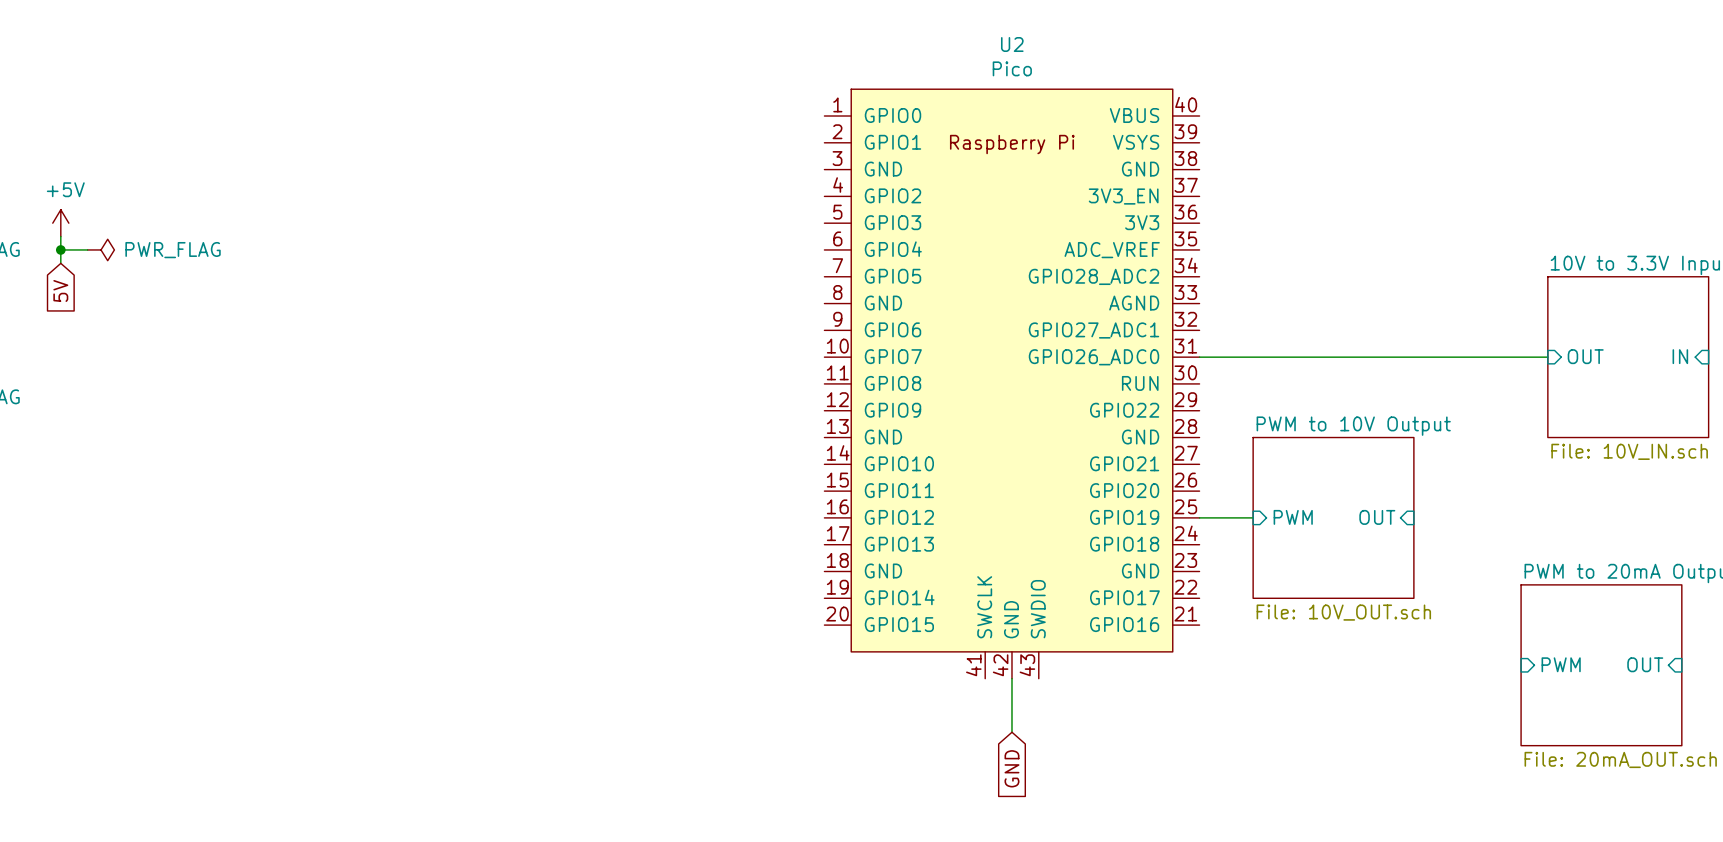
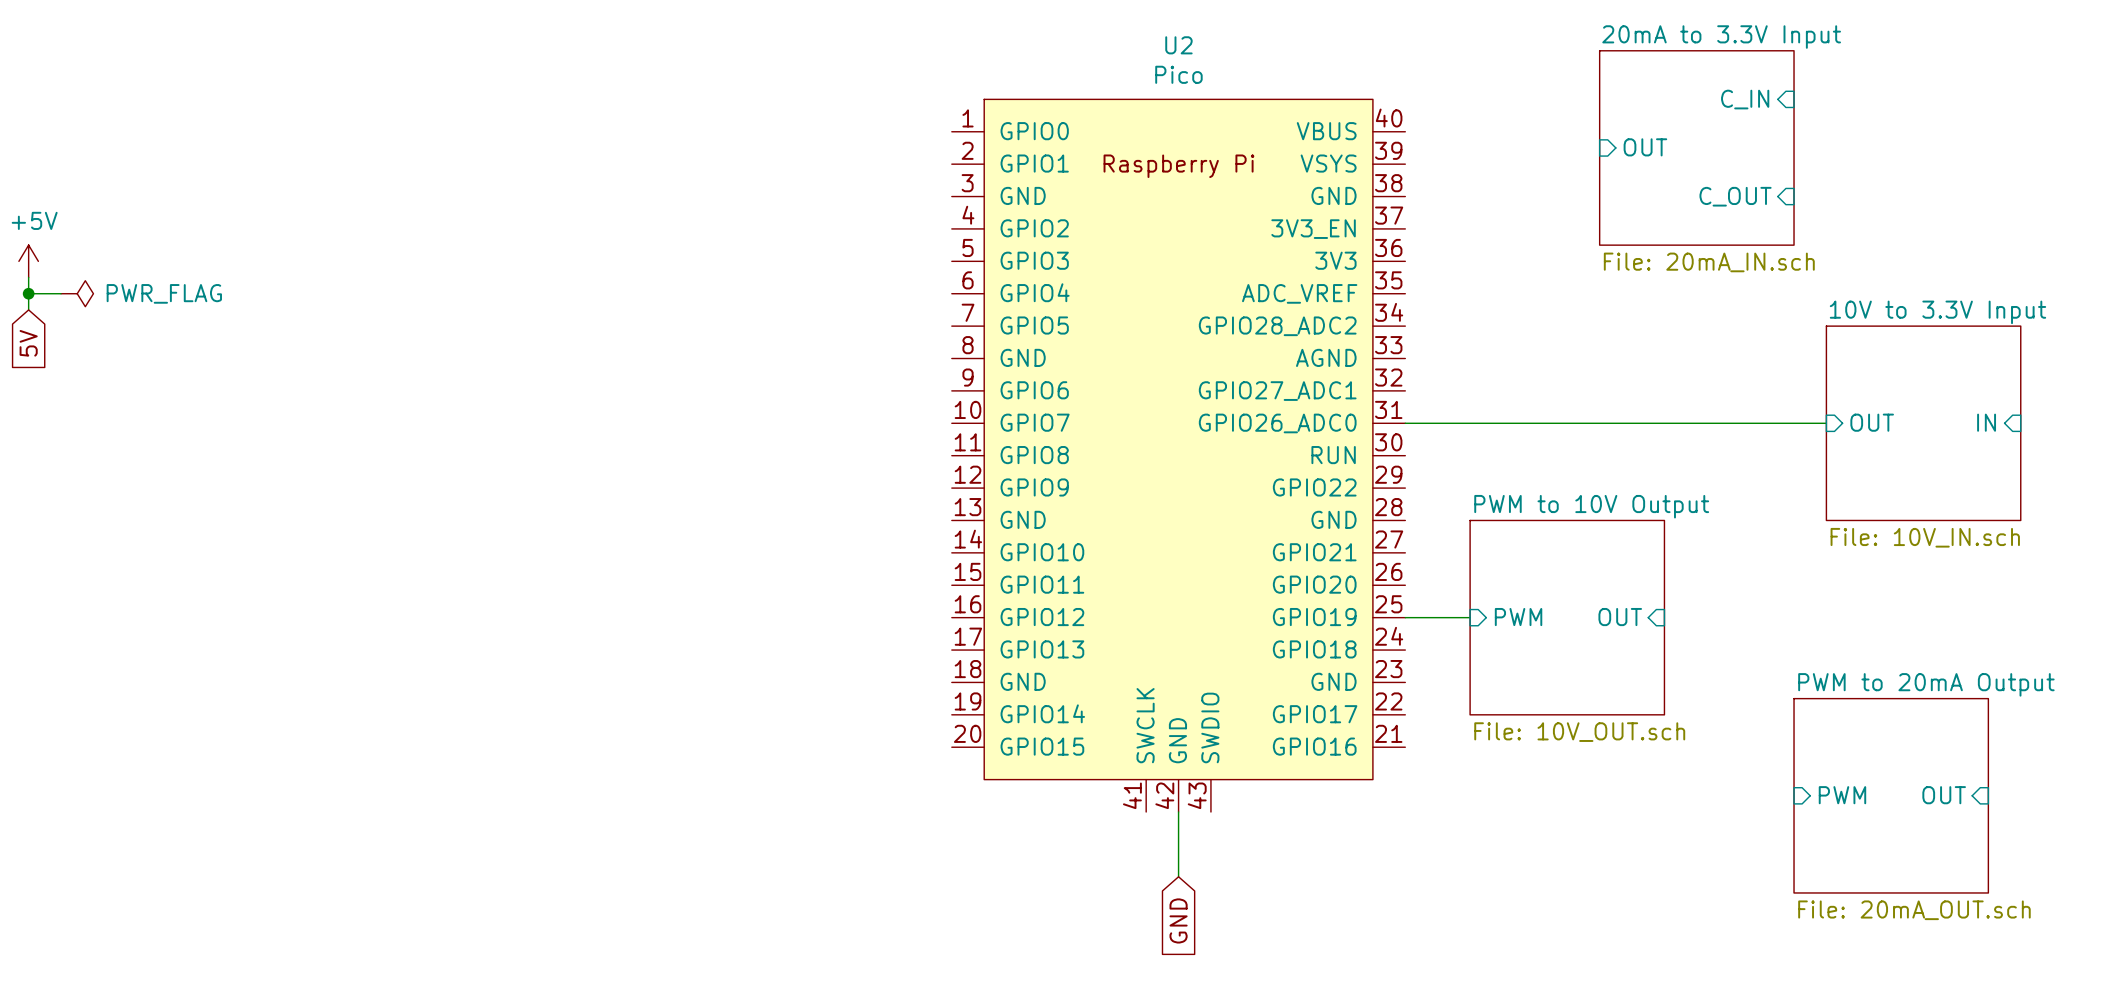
sheet pin: none -> C_IN (1745, 99)
sheet pin: none -> OUT (1645, 147)
sheet 20mA to 3.3V Input: none -> File: 20mA_IN.sch (1696, 147)
sheet pin: none -> C_OUT (1735, 196)

